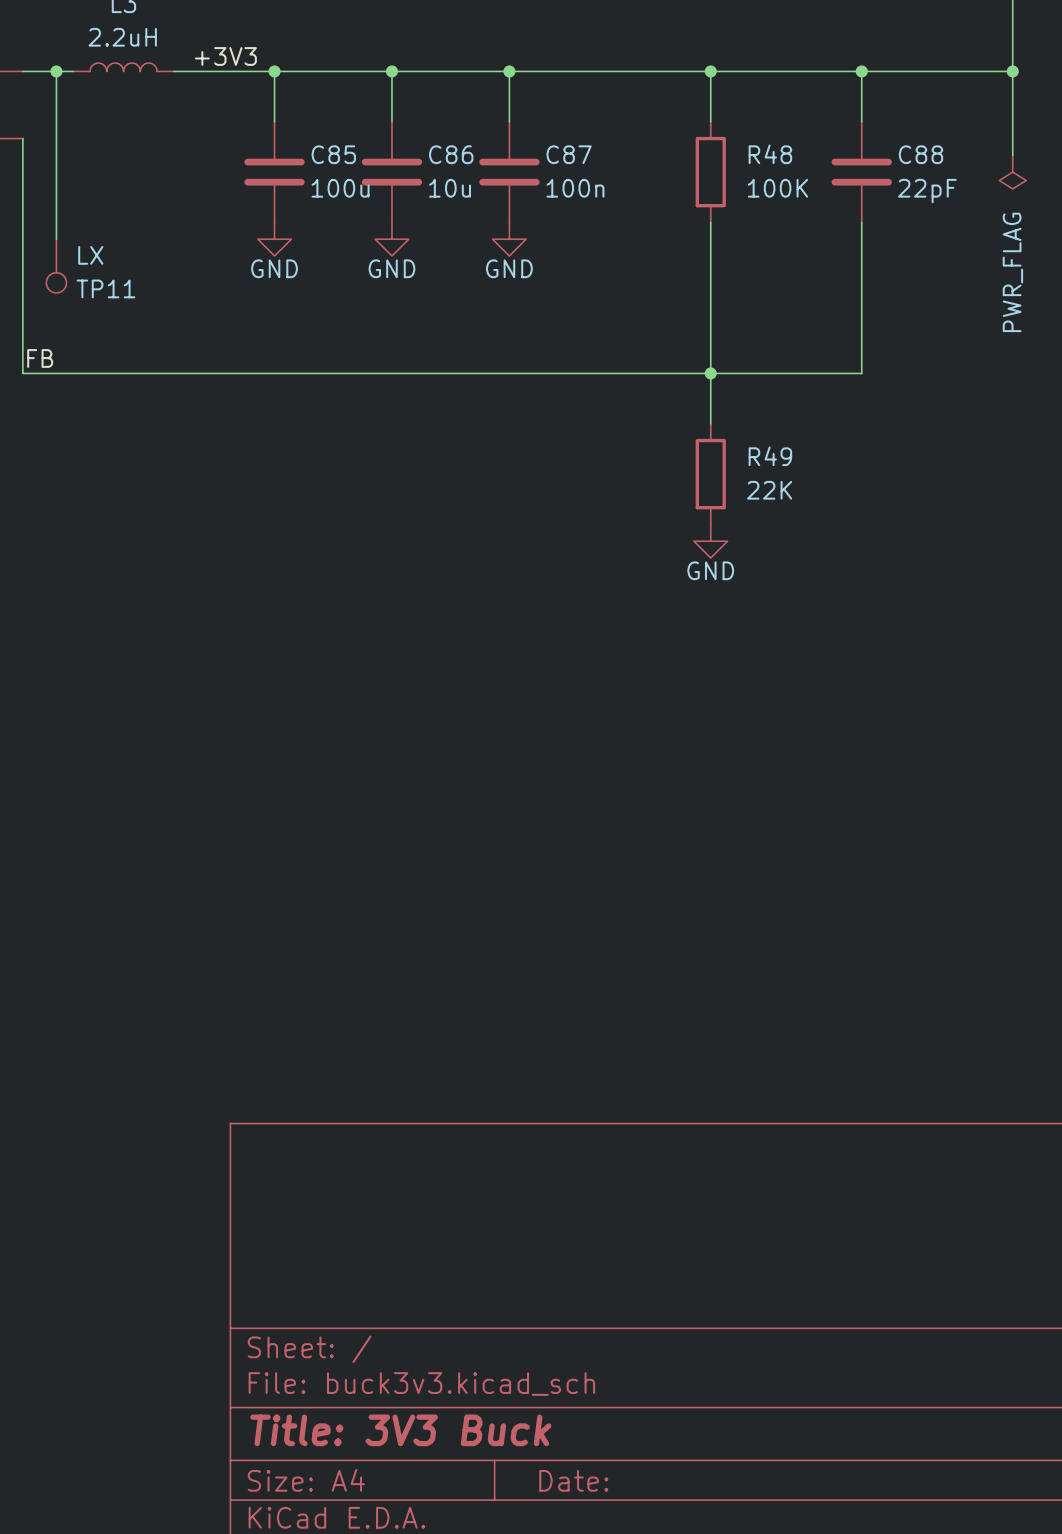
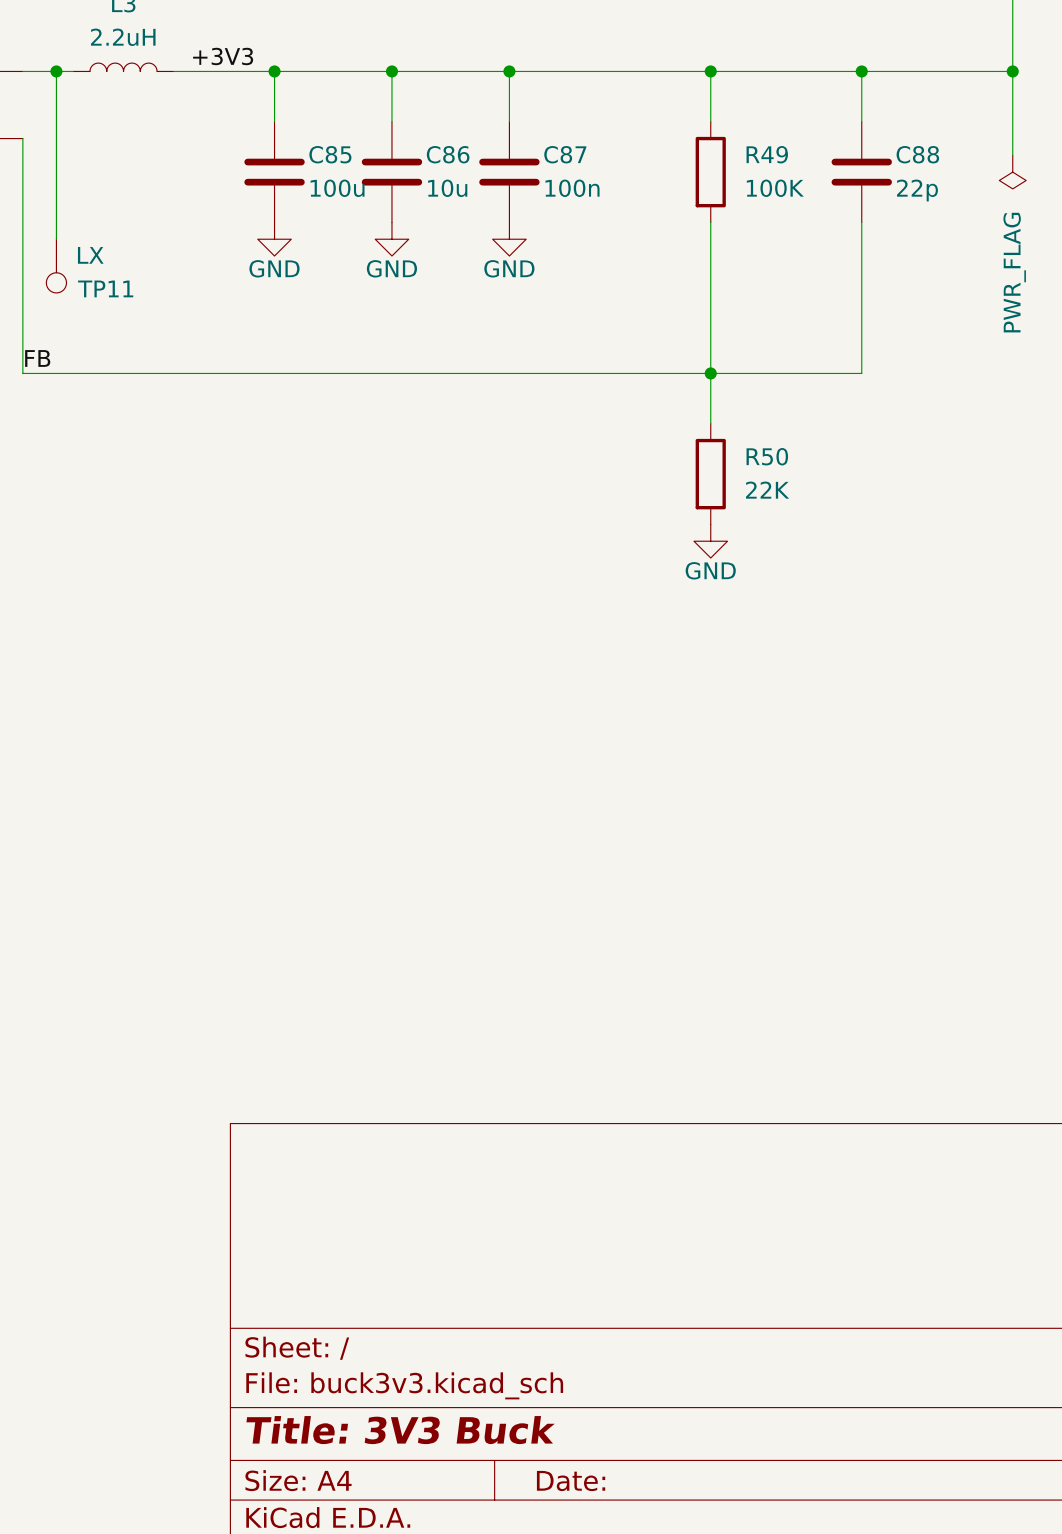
R48 name: R48 (770, 154) -> R49 (767, 154)
C88 value: 22pF (927, 191) -> 22p (917, 190)
R49 name: R49 (770, 456) -> R50 (767, 456)

